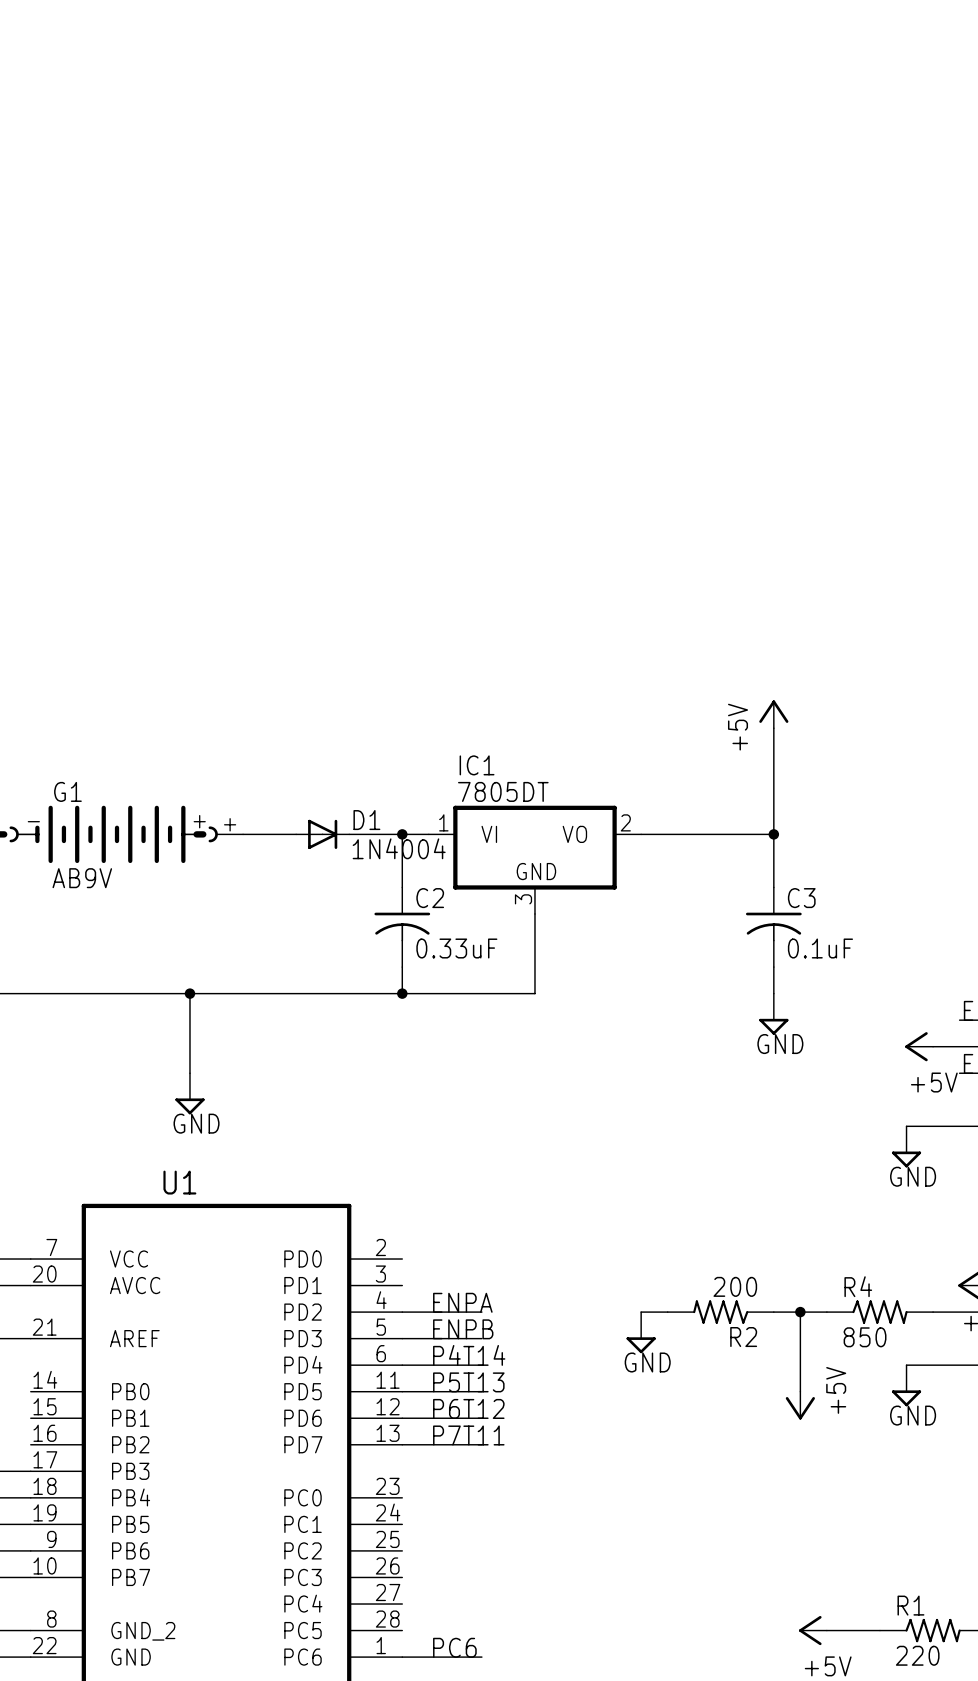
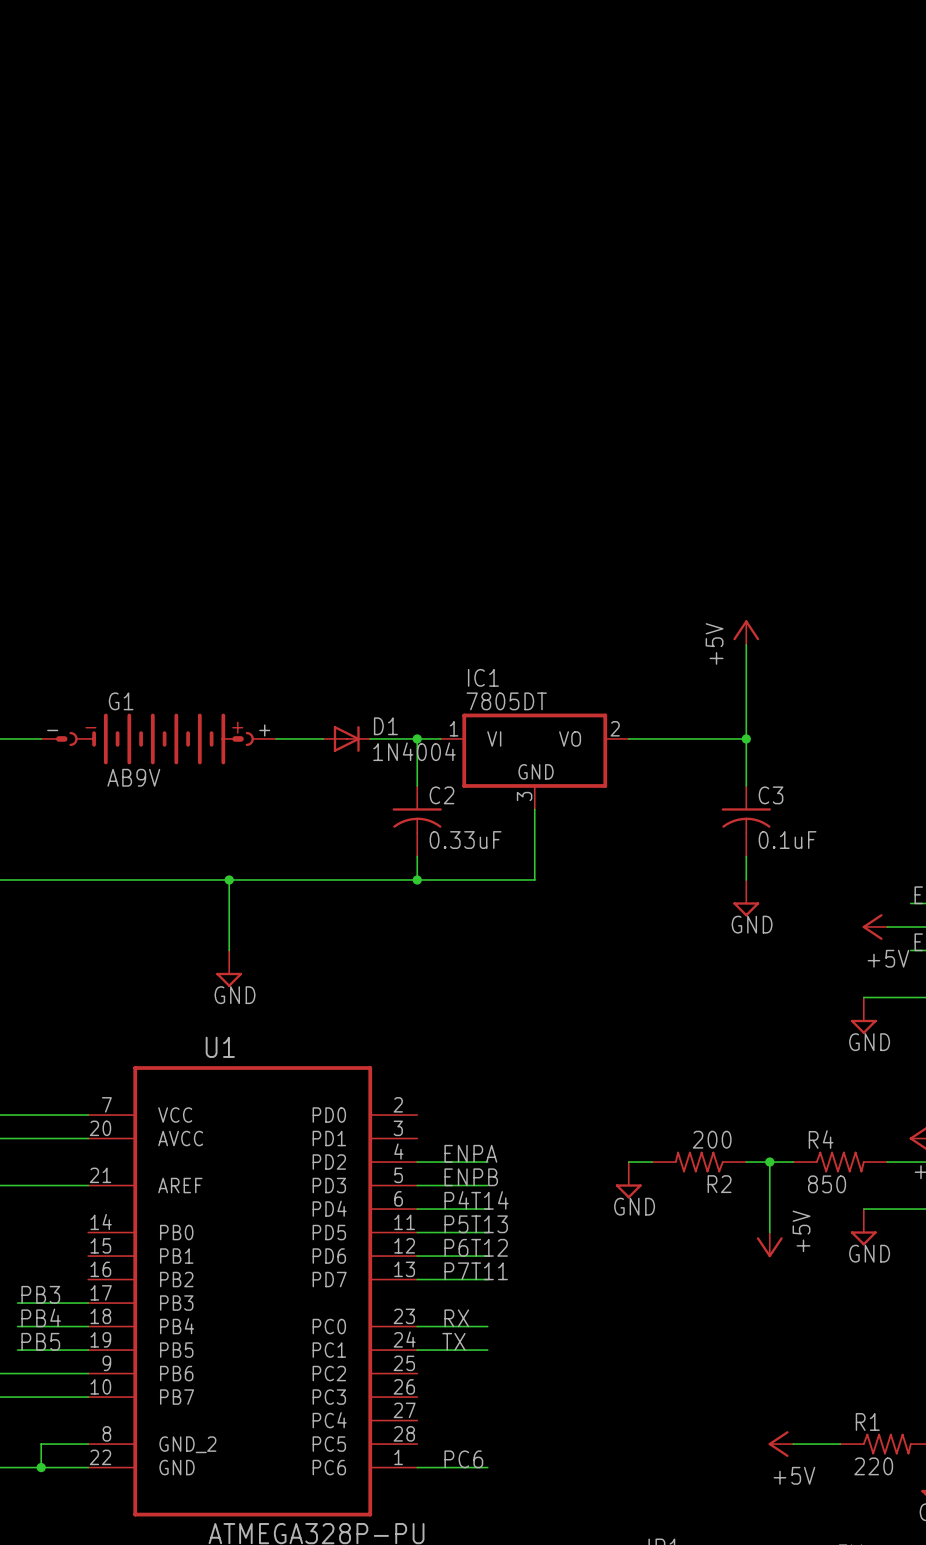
label: none -> RX (456, 1318)
wire: none -> (417, 1326) (487, 1326)
label: none -> TX (453, 1341)
wire: none -> (417, 1350) (487, 1350)

